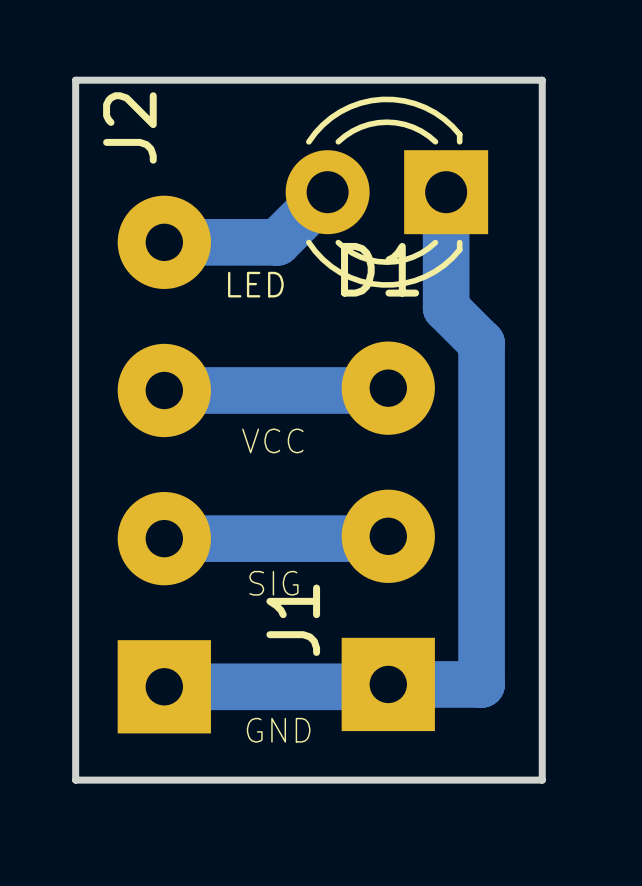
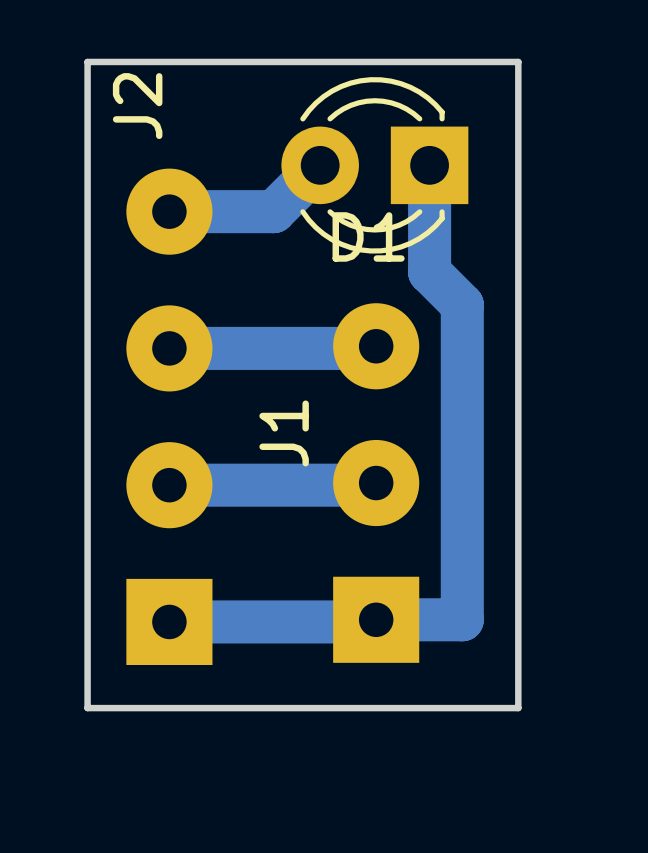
text: LED (255, 284) -> none
text: VCC (272, 440) -> none
text: SIG (273, 583) -> none
J1 name position: J1 (293, 620) -> J1 (284, 433)
text: GND (278, 730) -> none

